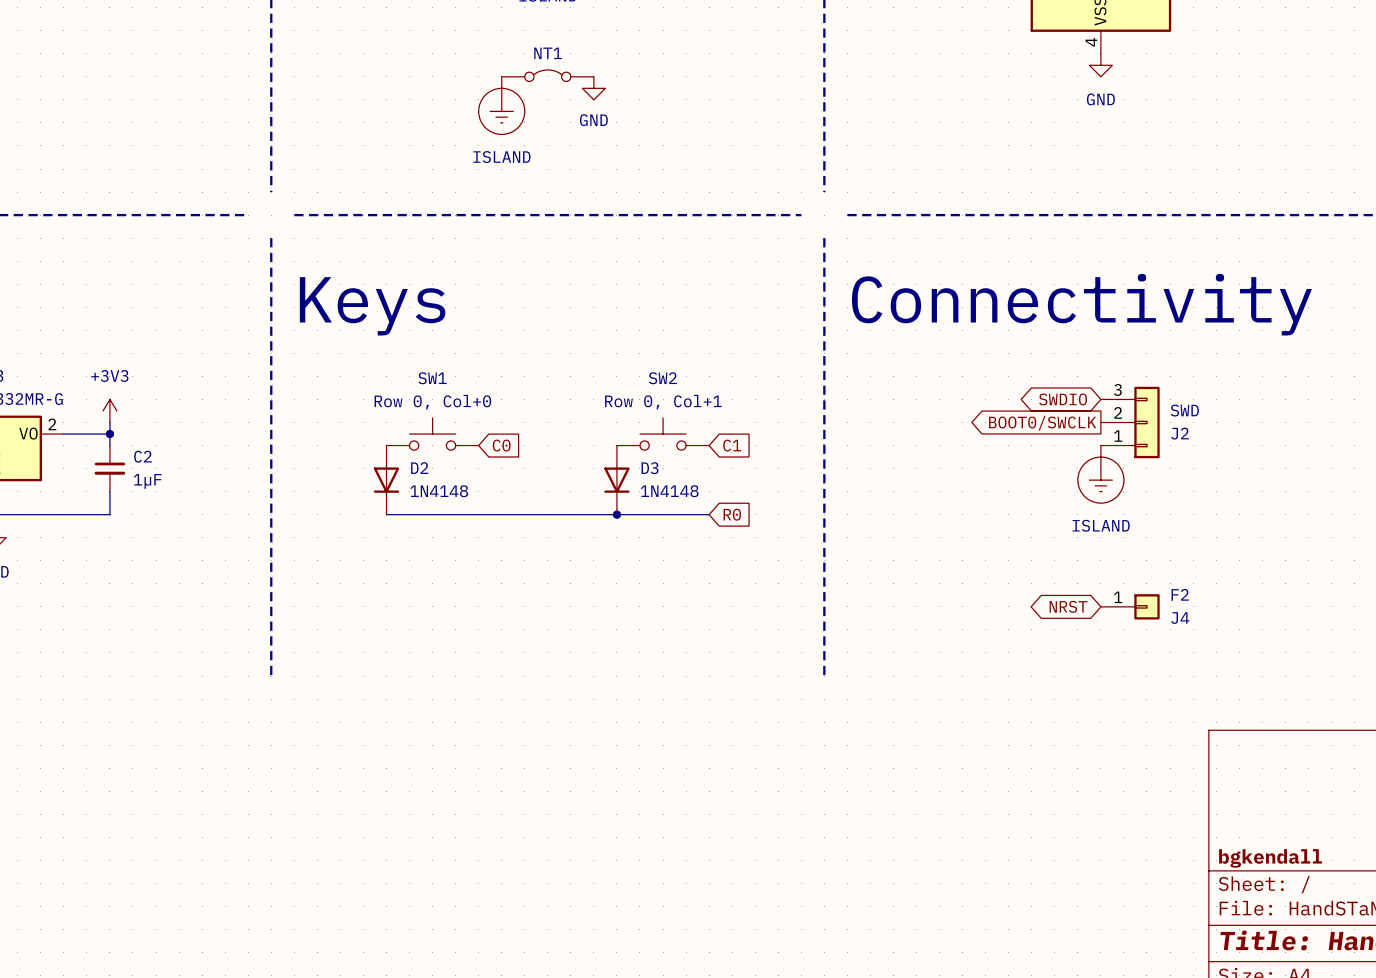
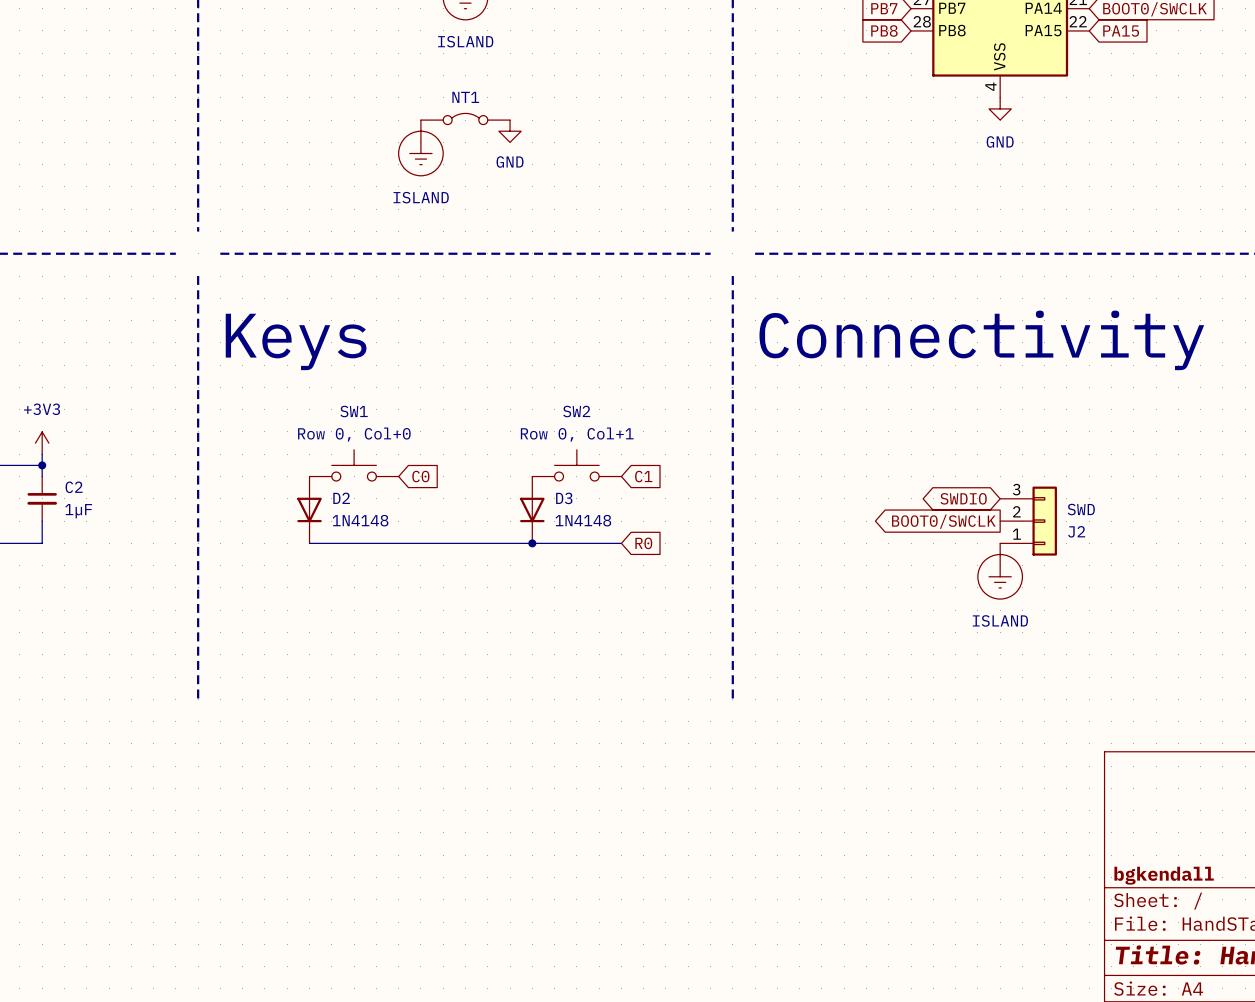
global label position: SWDIO (1063, 399) -> SWDIO (963, 498)
J2 position: (1130, 422) -> (1028, 521)
global label position: BOOT0/SWCLK (1042, 423) -> BOOT0/SWCLK (943, 521)
power symbol position: ISLAND (1100, 474) -> ISLAND (1000, 571)
global label: NRST (1068, 606) -> none
J4: F2 (1130, 606) -> none

